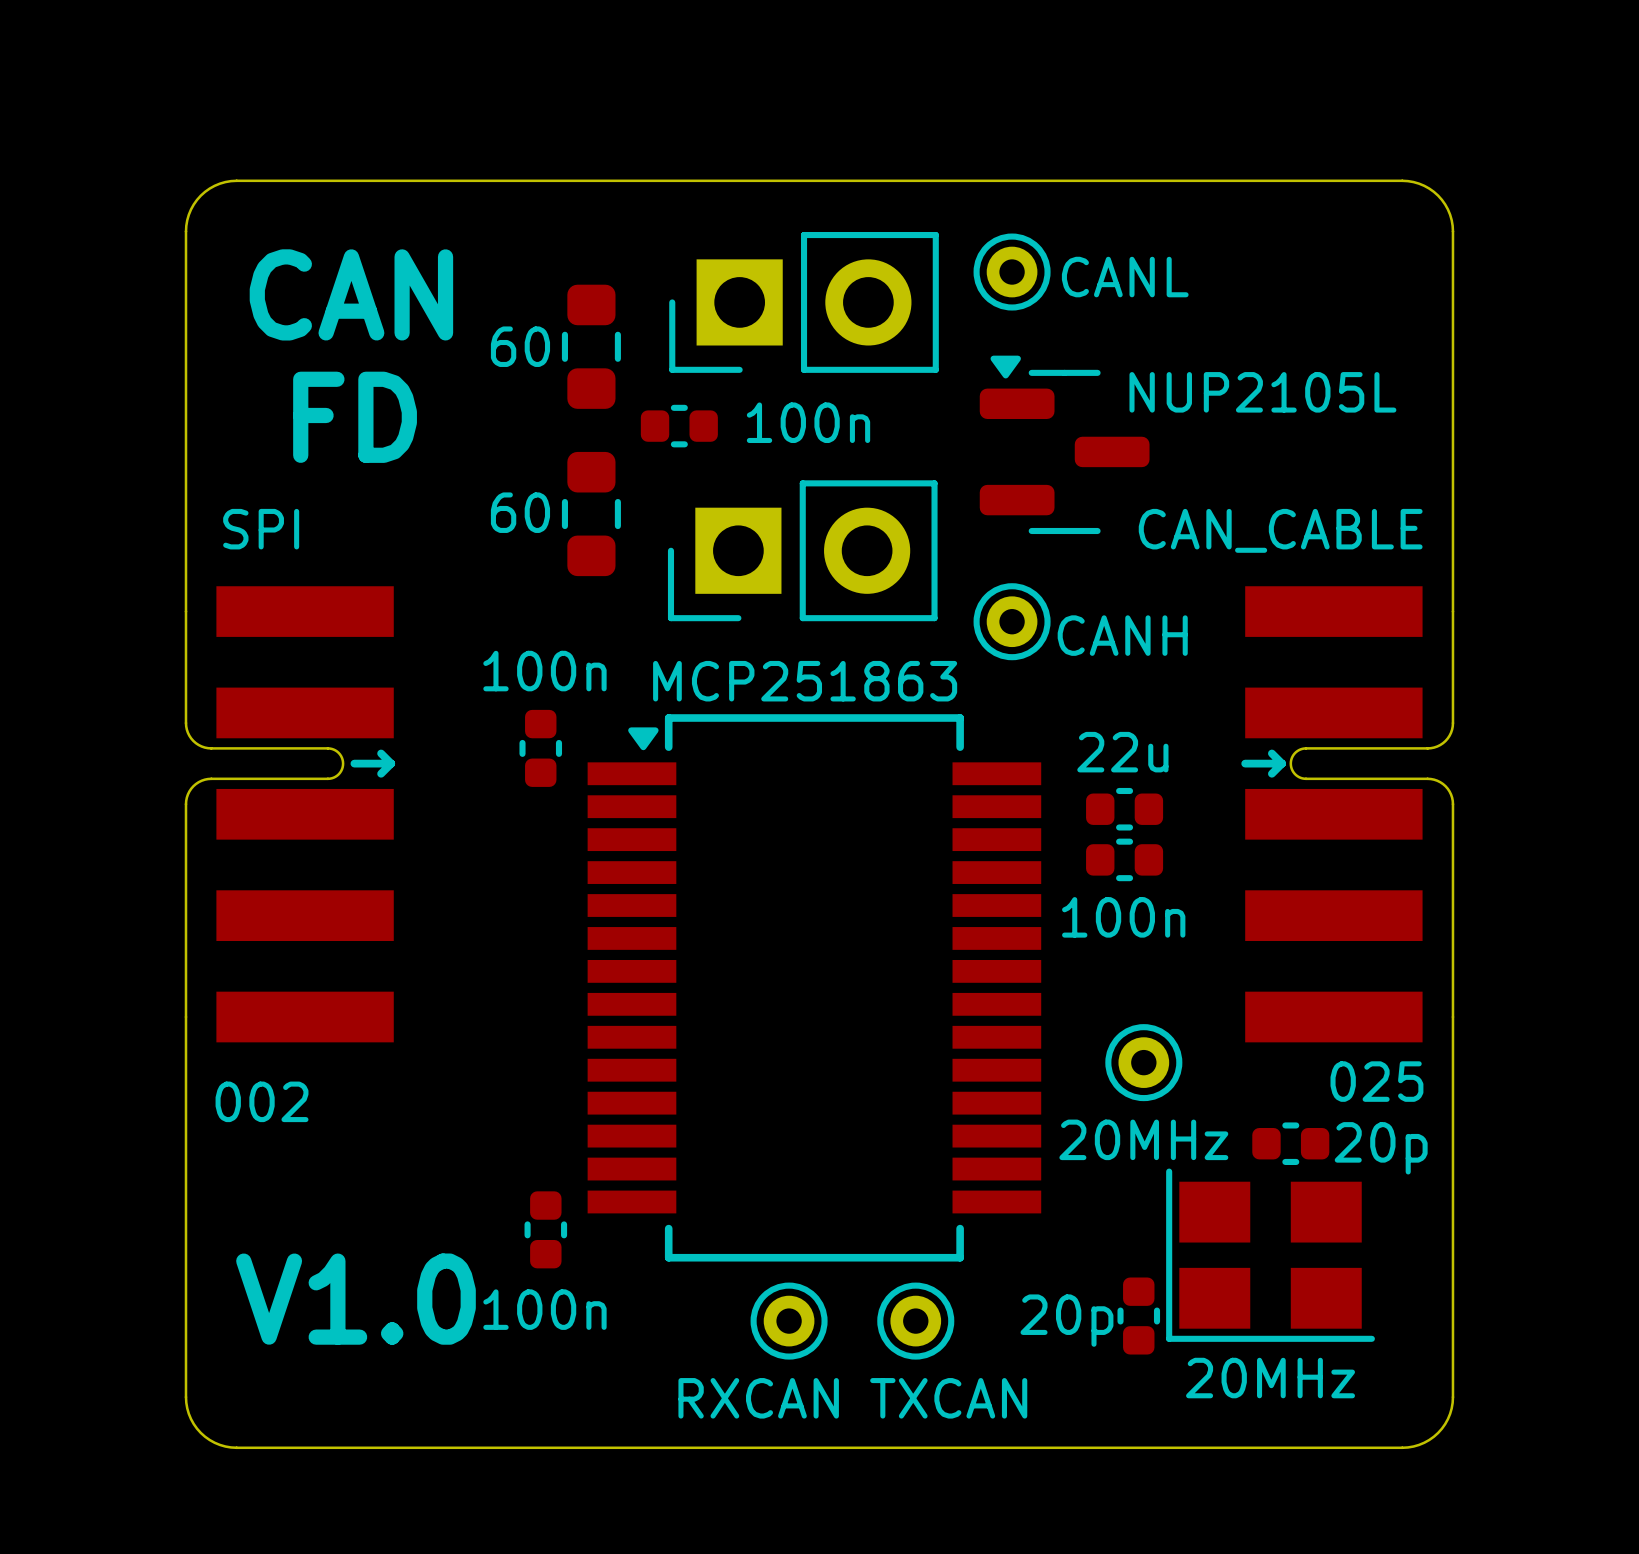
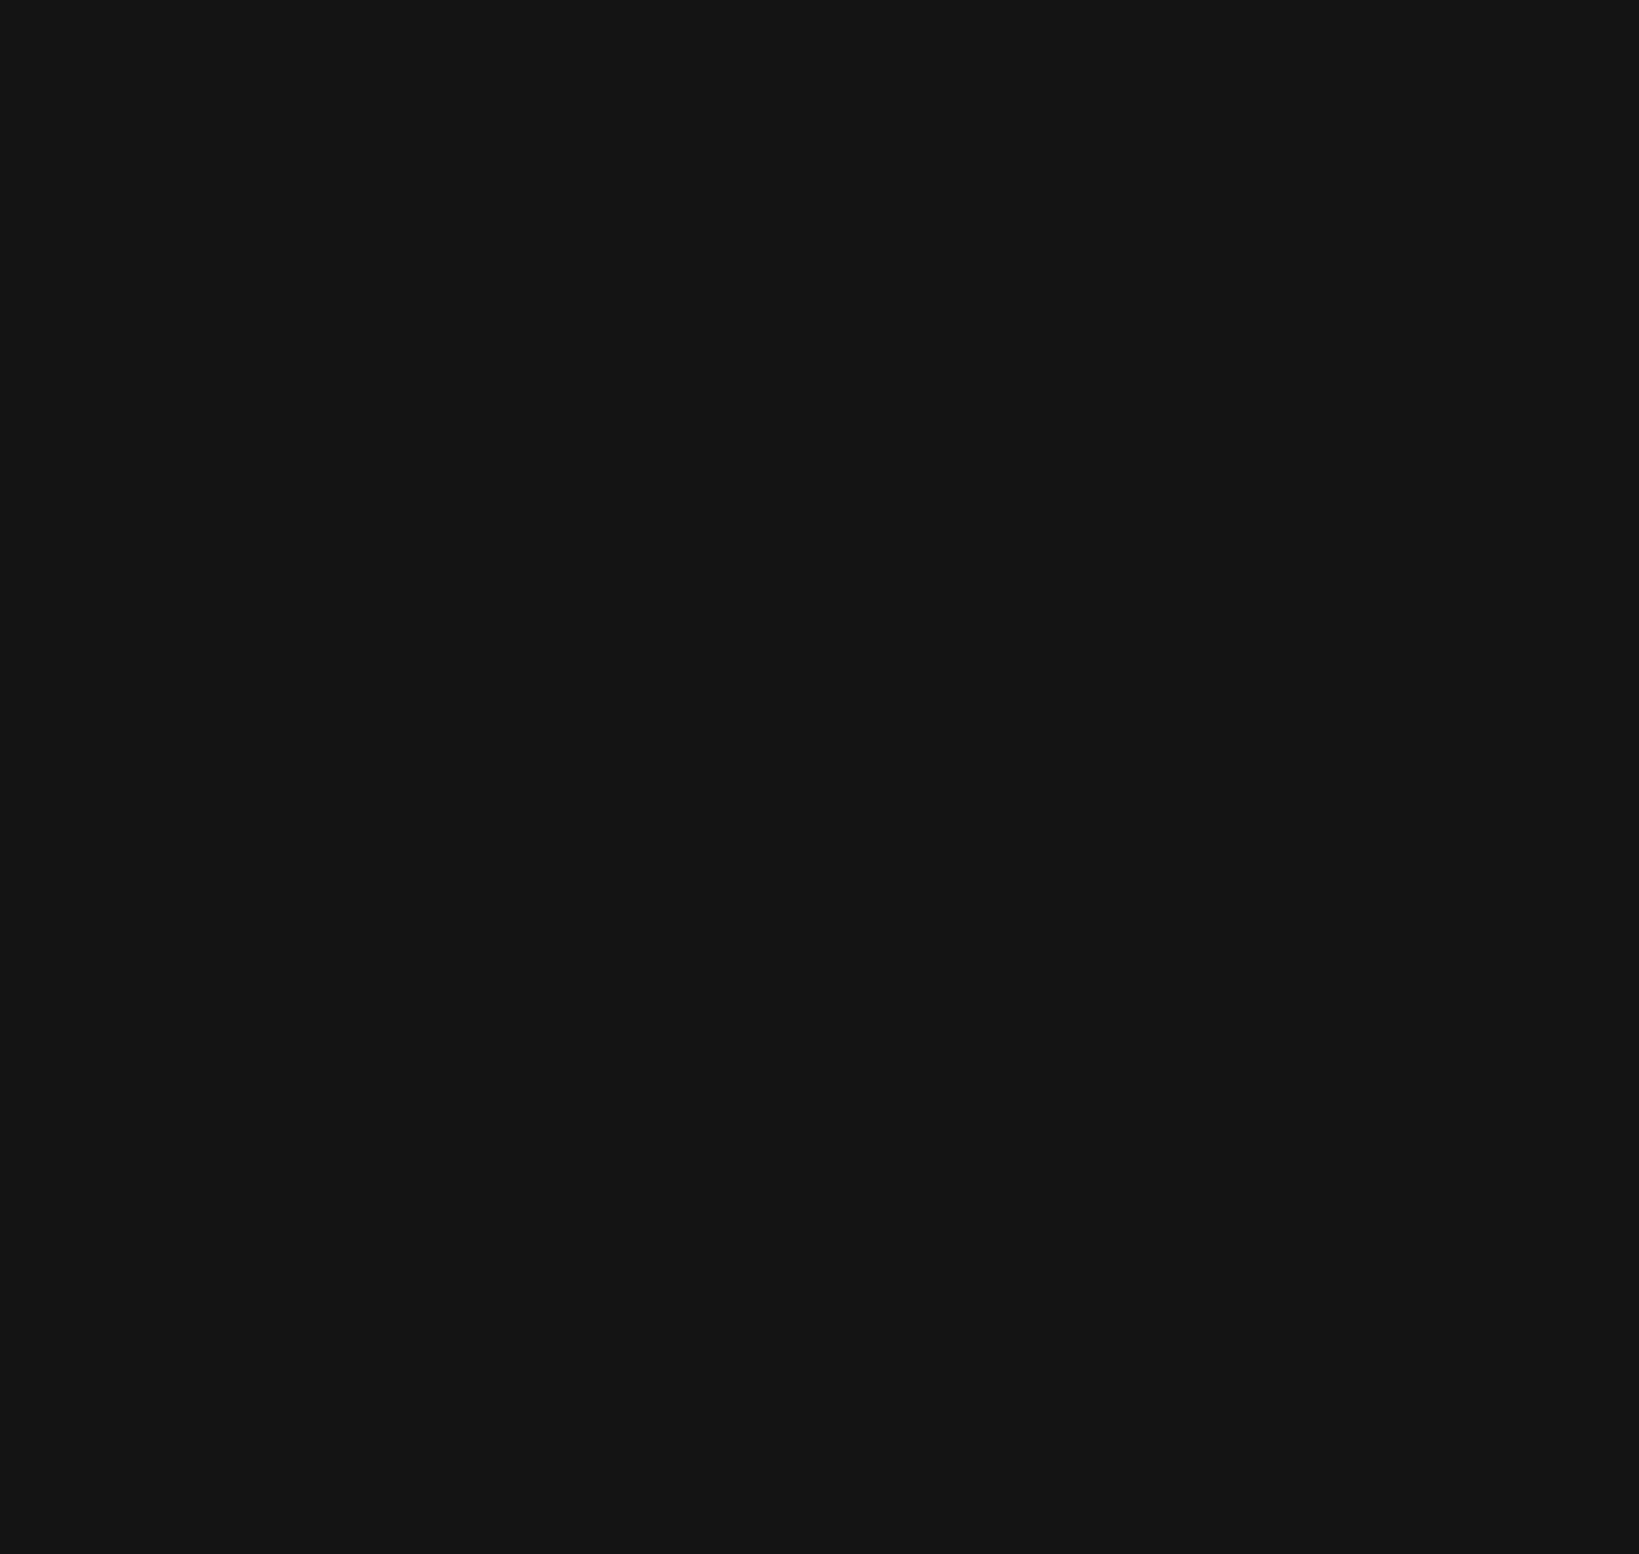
part: CANL (1012, 272) -> none
text: CAN (351, 294) -> none
part: (804, 302) -> none
part: 60 (591, 346) -> none
text: FD (355, 417) -> none
part: 100n (679, 426) -> none
part: NUP2105L (1064, 444) -> none
part: 60 (591, 514) -> none
part: (802, 550) -> none
board edge: (185, 611) (186, 225) (191, 209) (200, 195) (214, 185) (236, 180) (1402, 180) (1419, 183) (1429, 188) (1441, 199) (1450, 214) (1452, 225) (1452, 611) -> none
part: CANH (1012, 621) -> none
part: 100n (540, 748) -> none
part: 22u (1124, 809) -> none
part: 002 (289, 814) -> none
part: 025 (1347, 814) -> none
part: 100n (1124, 859) -> none
part: MCP251863 (814, 987) -> none
board edge: (185, 1017) (186, 1402) (191, 1419) (205, 1436) (219, 1444) (236, 1447) (1402, 1447) (1419, 1444) (1433, 1436) (1441, 1428) (1450, 1413) (1452, 1402) (1452, 1017) -> none
part: 20MHz (1143, 1062) -> none
part: 20p (1290, 1143) -> none
part: 100n (545, 1229) -> none
part: 20MHz (1270, 1255) -> none
text: V1.0 (355, 1299) -> none
part: 20p (1138, 1316) -> none
part: RXCAN (789, 1321) -> none
part: TXCAN (915, 1321) -> none

